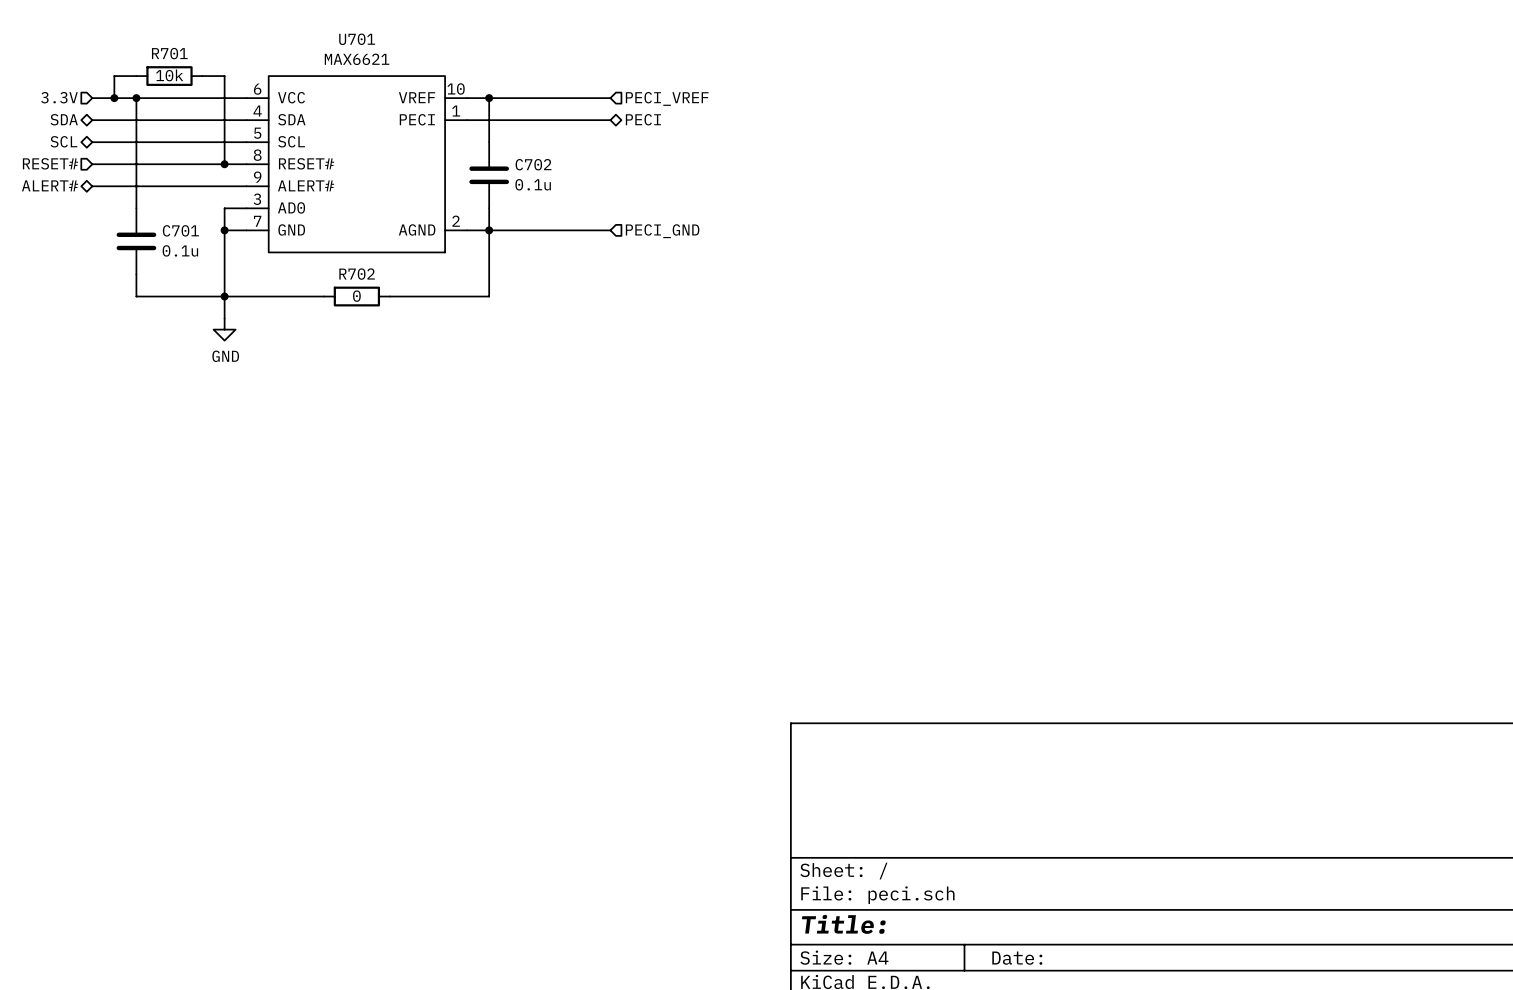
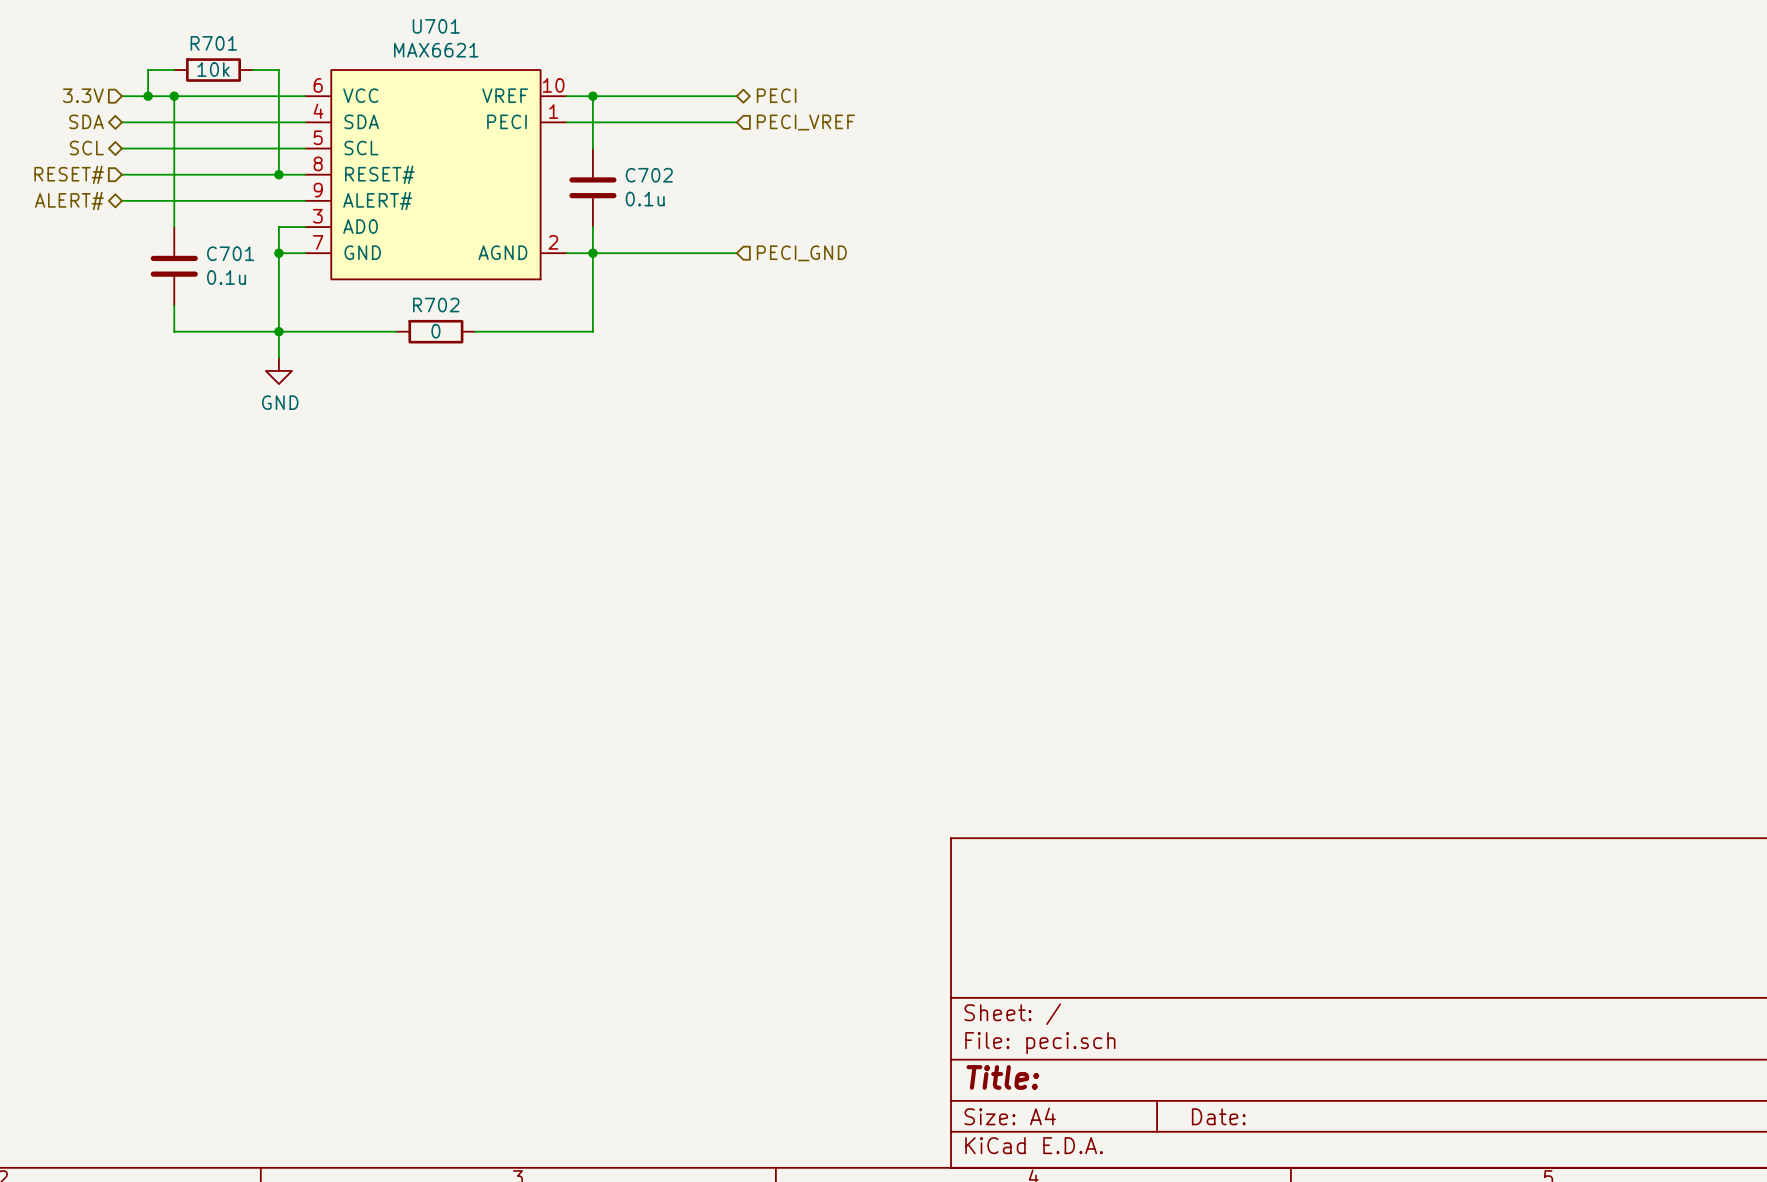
hierarchical label shape: input (667, 98) -> bidirectional (776, 95)
hierarchical label: PECI_VREF (667, 98) -> PECI (776, 95)
hierarchical label shape: bidirectional (643, 119) -> input (805, 122)
hierarchical label: PECI (643, 119) -> PECI_VREF (805, 122)

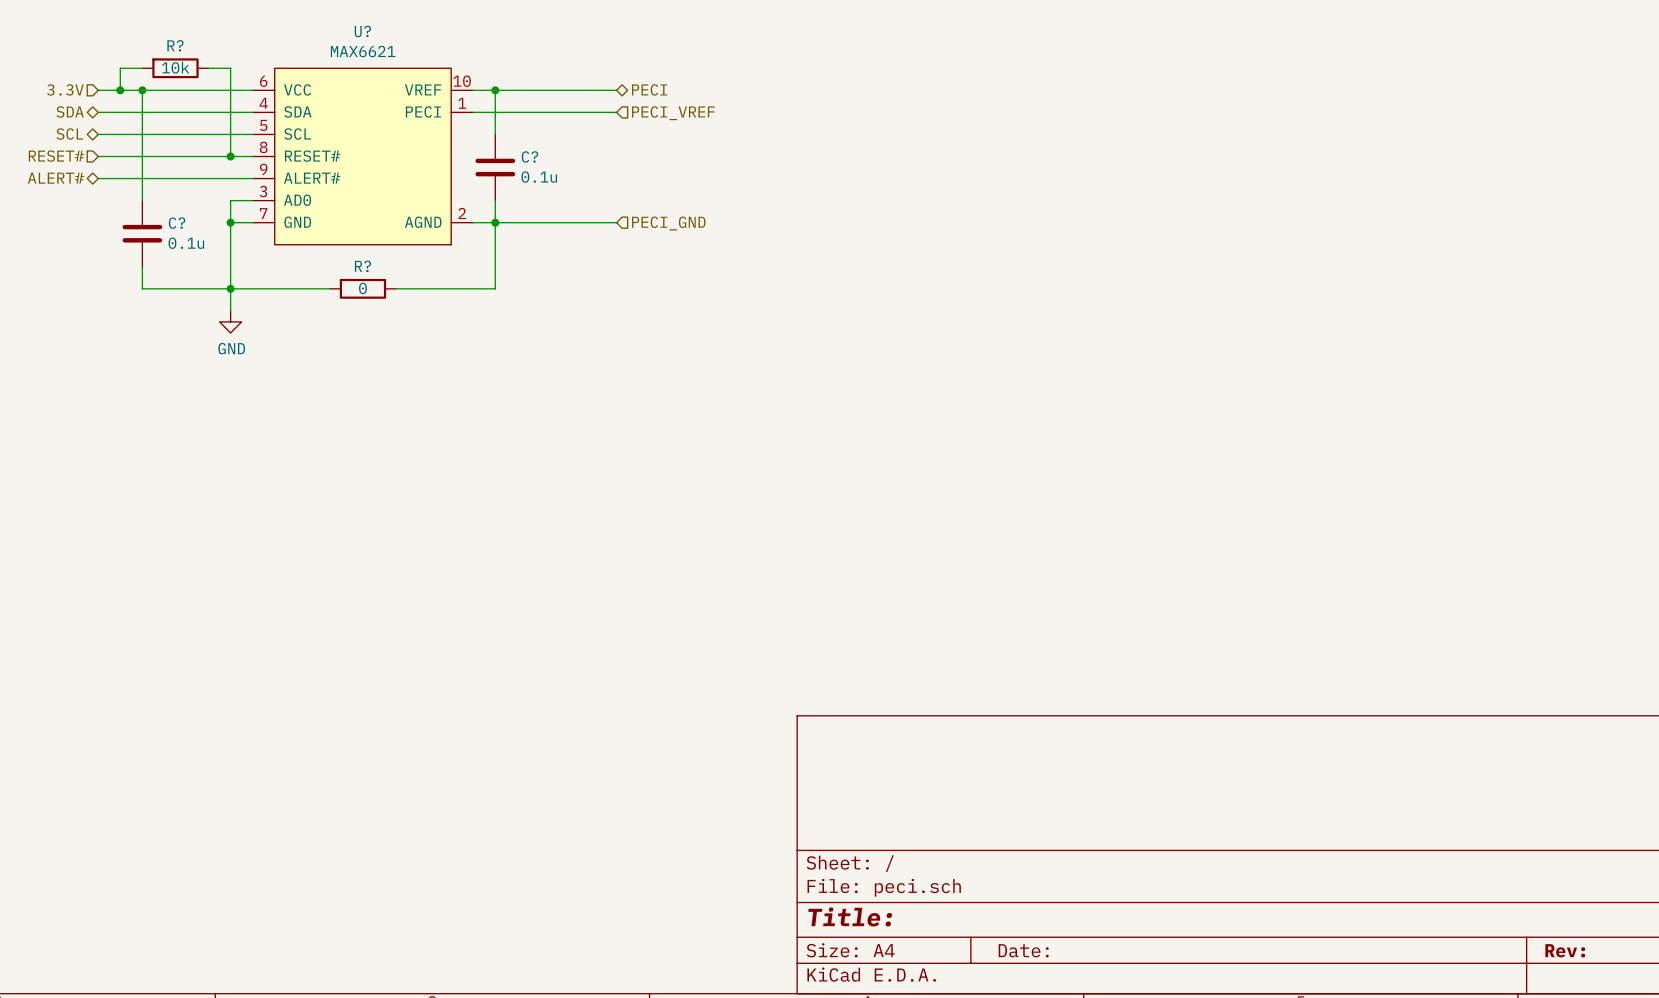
U701 name: U701 (436, 26) -> U? (362, 31)
R701 name: R701 (213, 43) -> R? (175, 45)
C702 name: C702 (649, 175) -> C? (529, 156)
C701 name: C701 (230, 253) -> C? (177, 223)
R702 name: R702 (436, 305) -> R? (362, 266)

